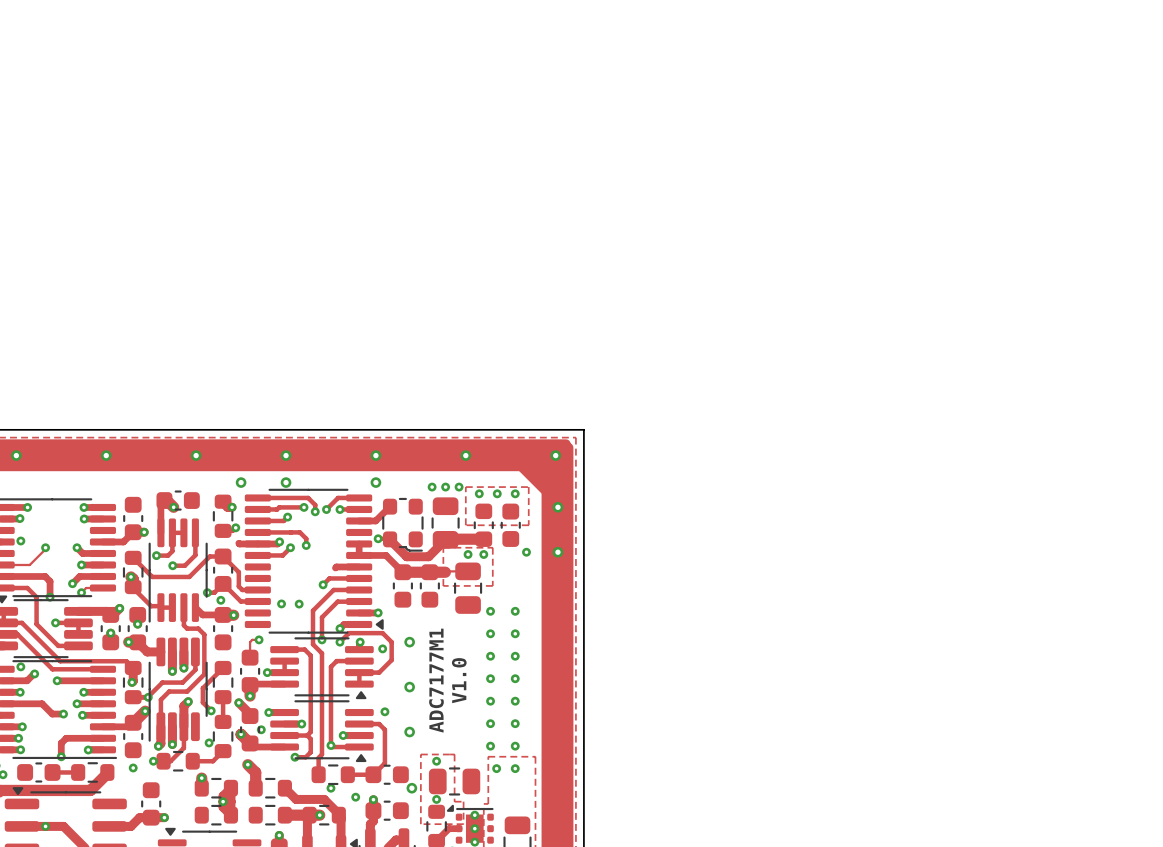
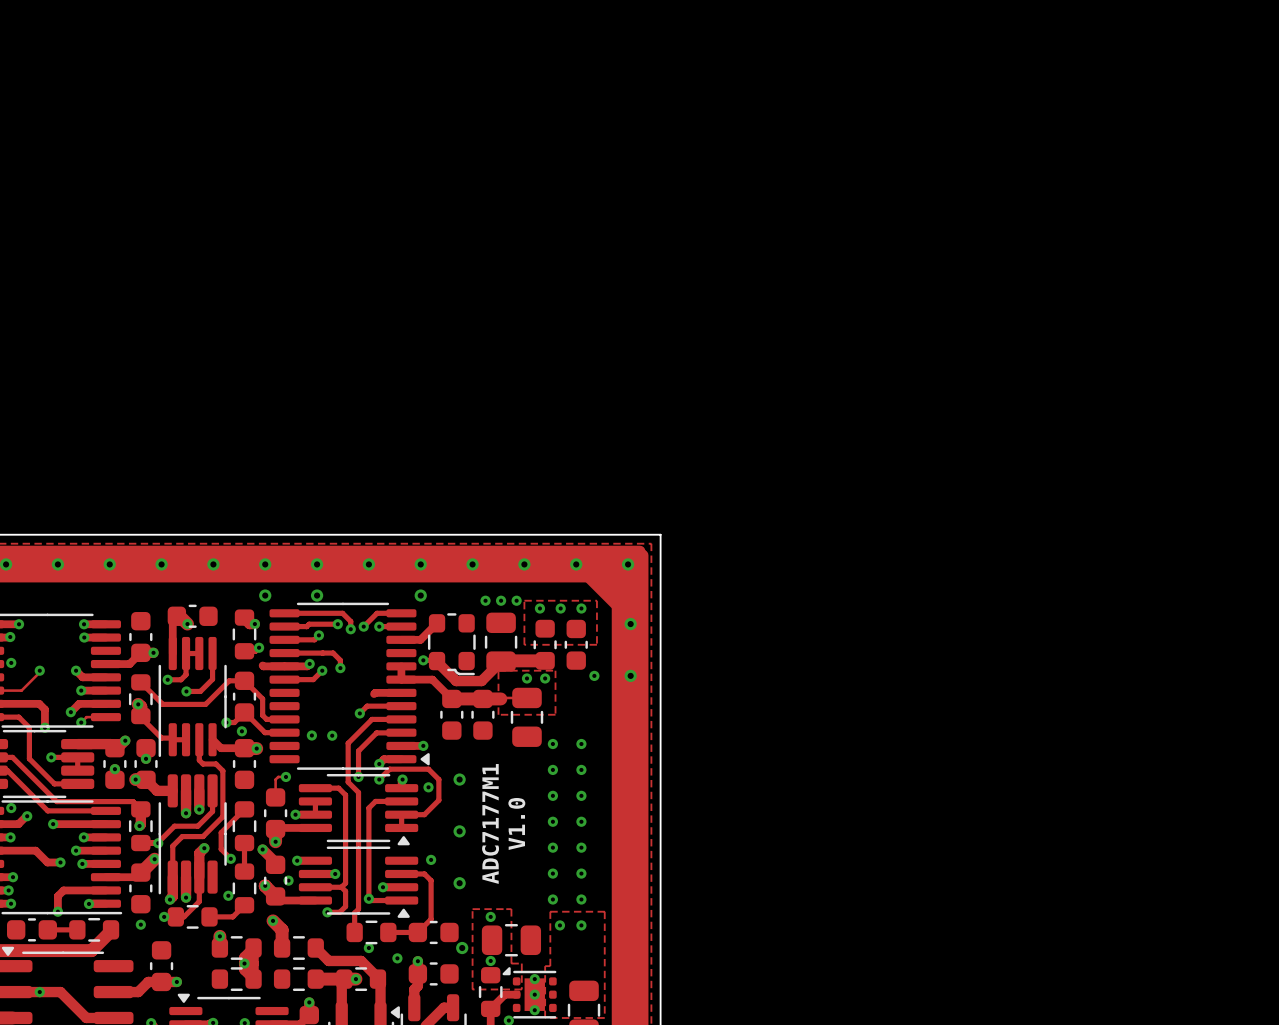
via: none -> (57, 564)
via: none -> (161, 564)
via: none -> (265, 564)
via: none -> (368, 564)
via: none -> (472, 564)
via: none -> (576, 564)

